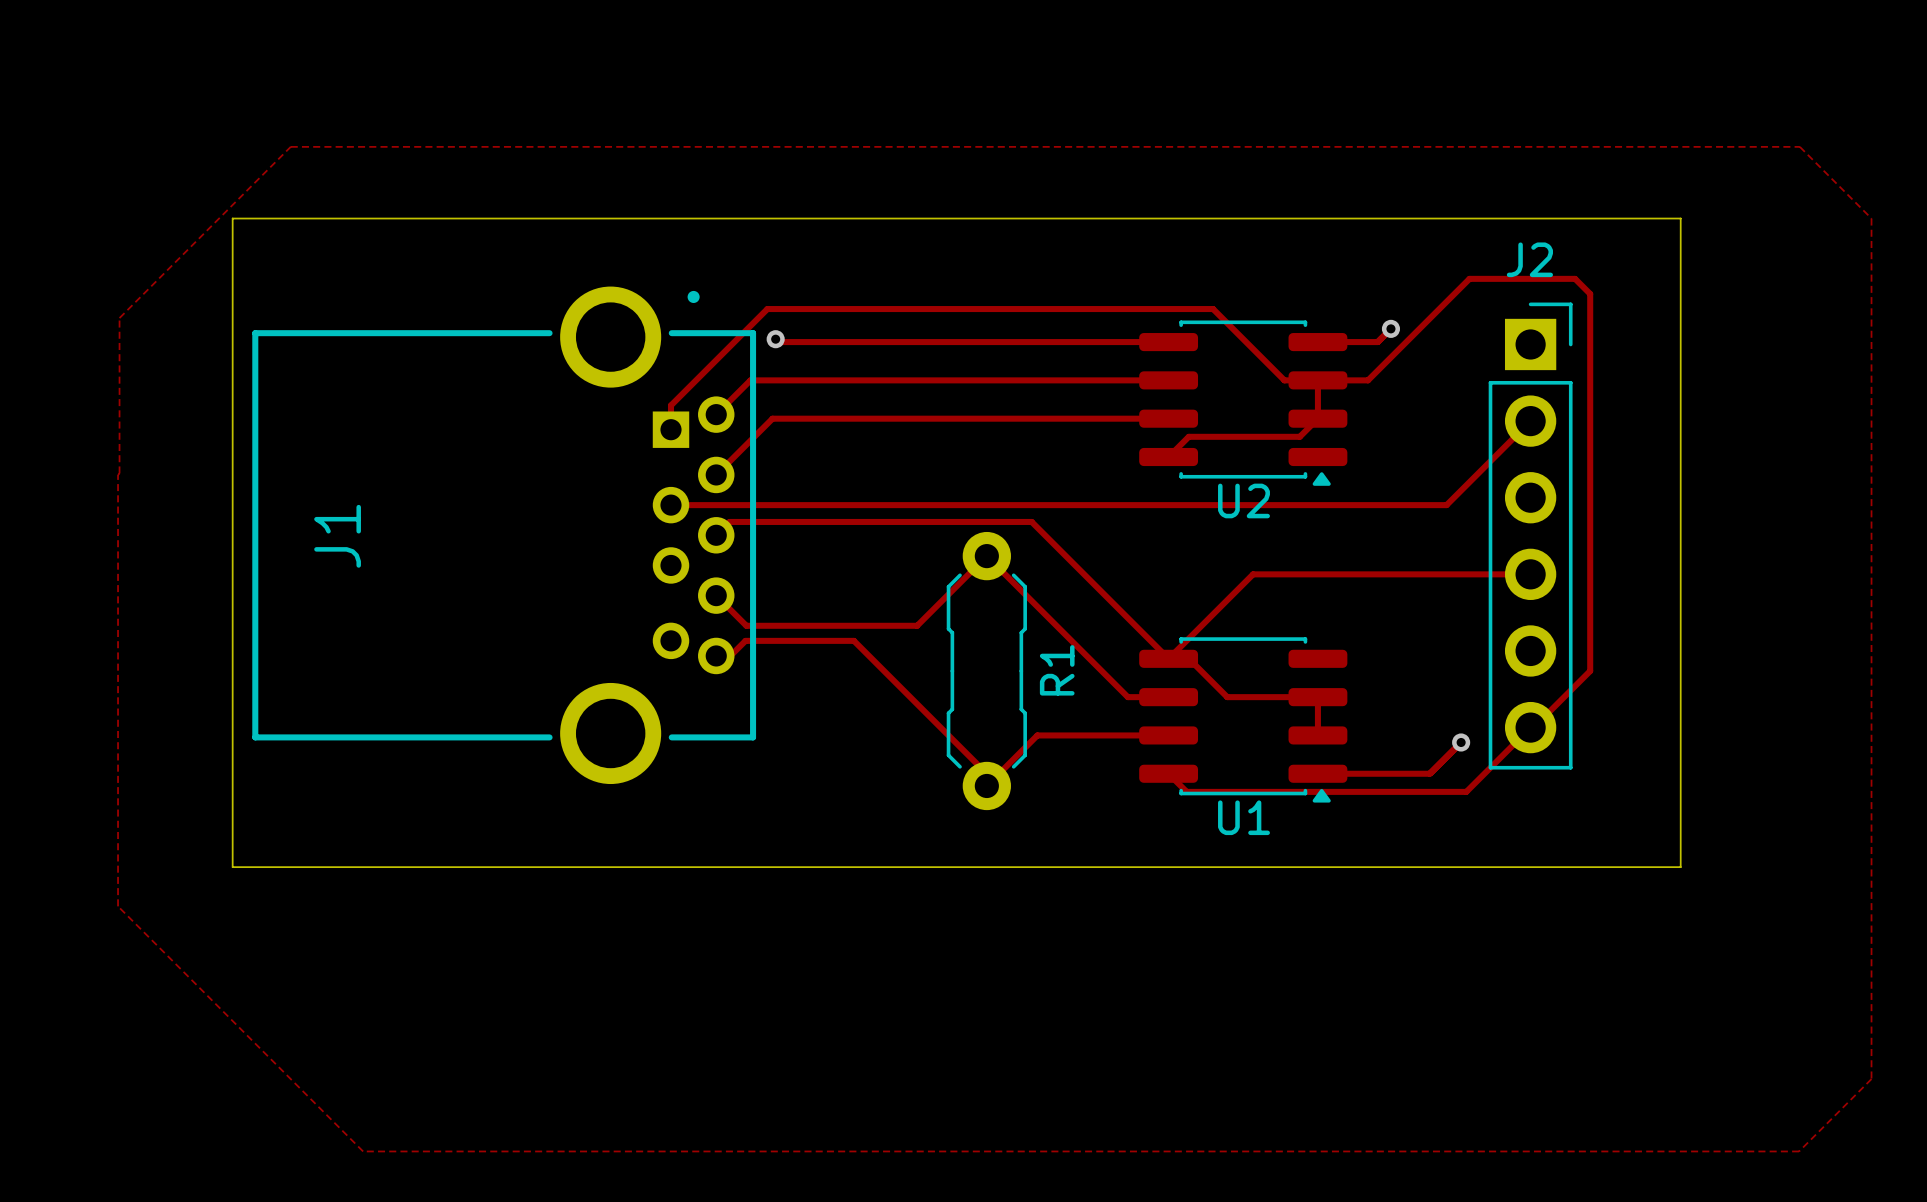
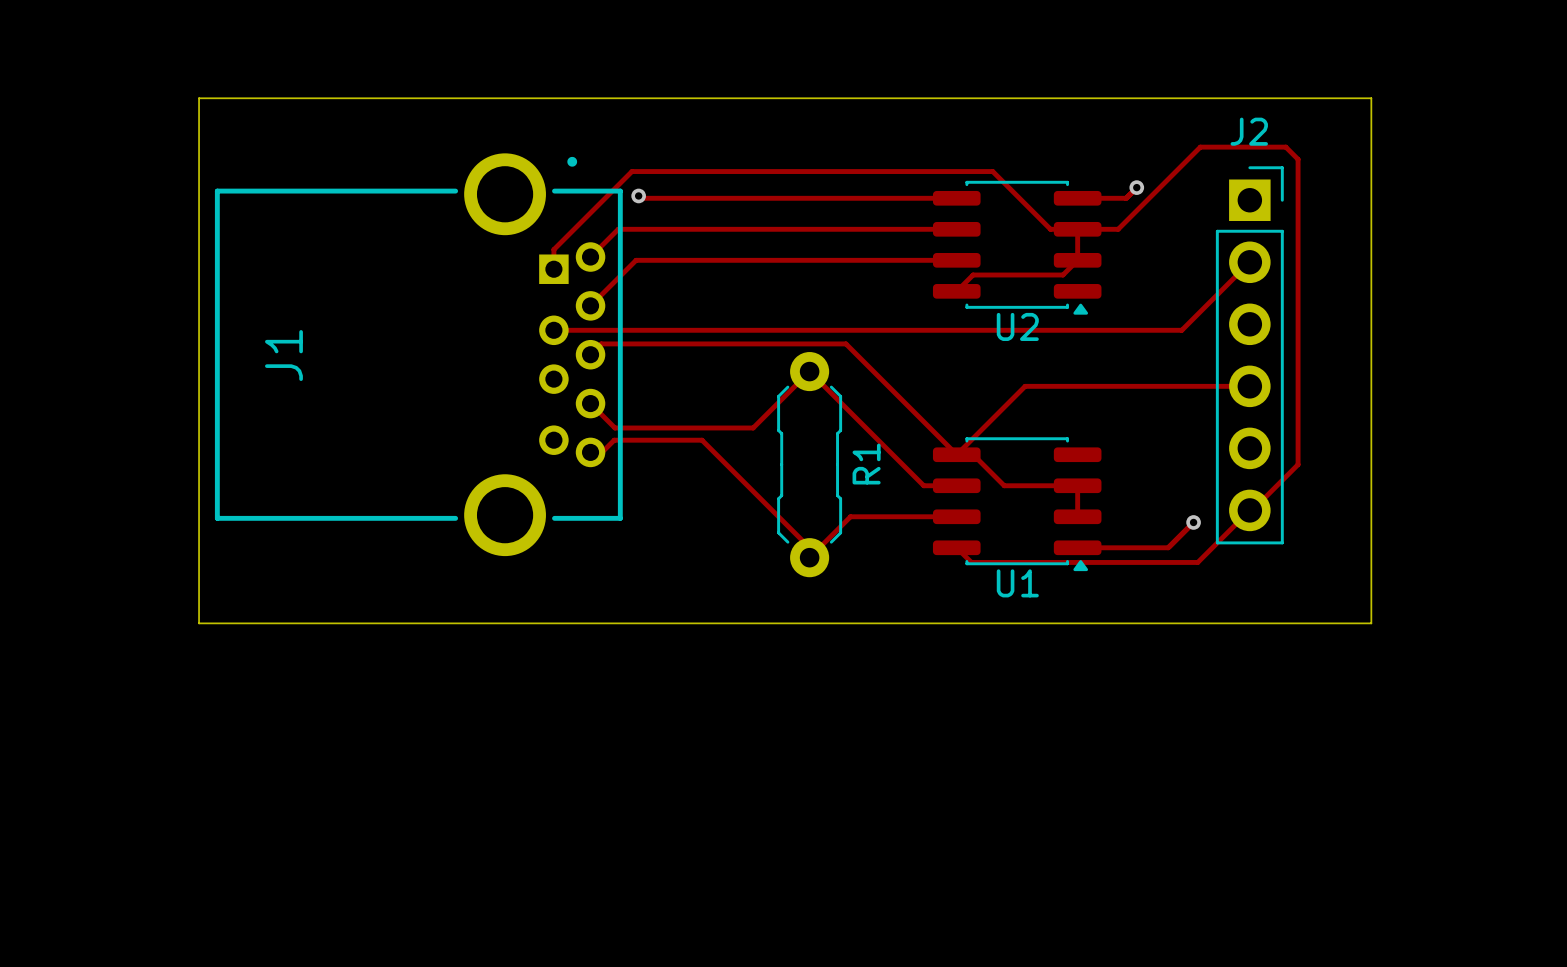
zone outline: (290, 146) (1799, 146) (1871, 218) (1871, 1079) (1799, 1151) (363, 1151) (118, 906) (119, 318) (290, 146) -> none

